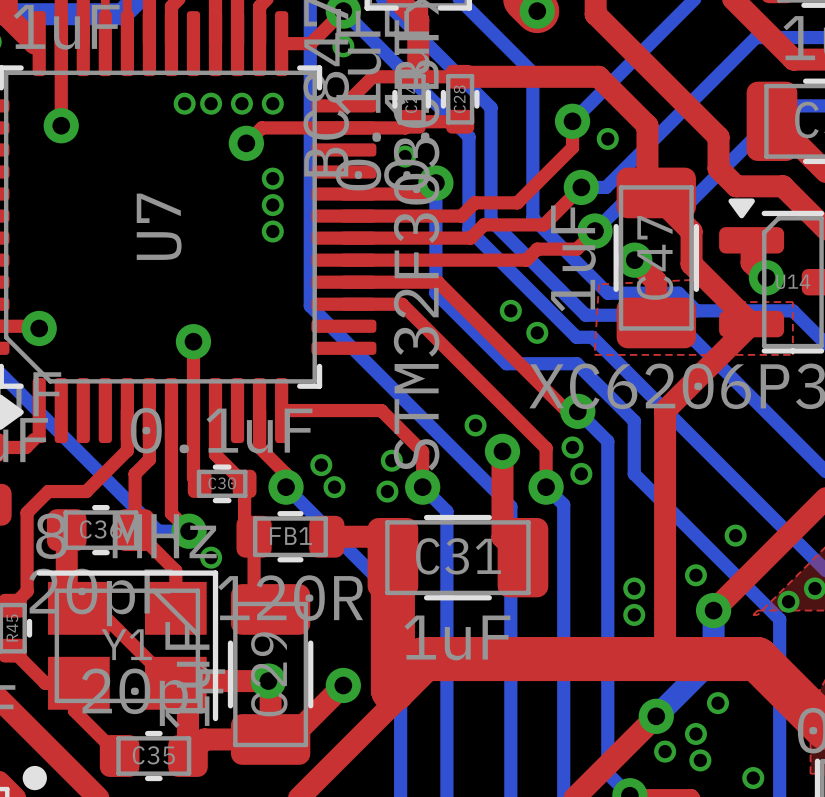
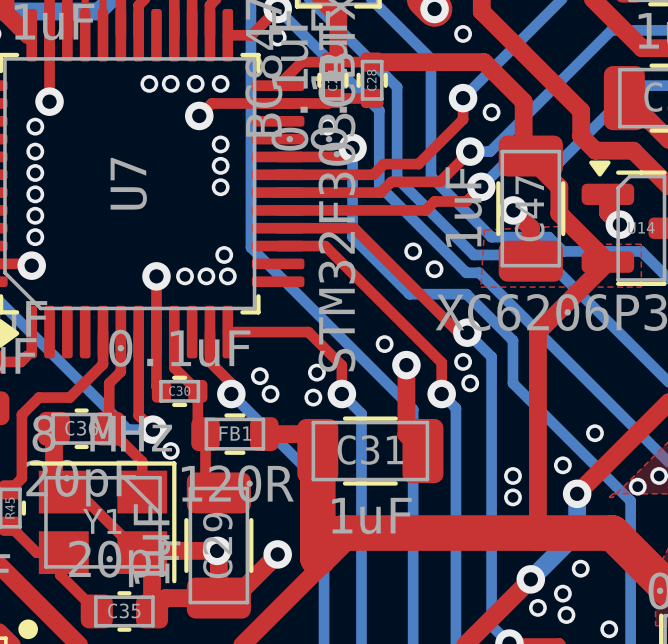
via: none -> (463, 33)
via: none -> (35, 126)
via: none -> (35, 151)
via: none -> (35, 172)
via: none -> (35, 194)
via: none -> (35, 215)
via: none -> (35, 237)
via: none -> (224, 254)
via: none -> (185, 276)
via: none -> (206, 276)
via: none -> (227, 276)

